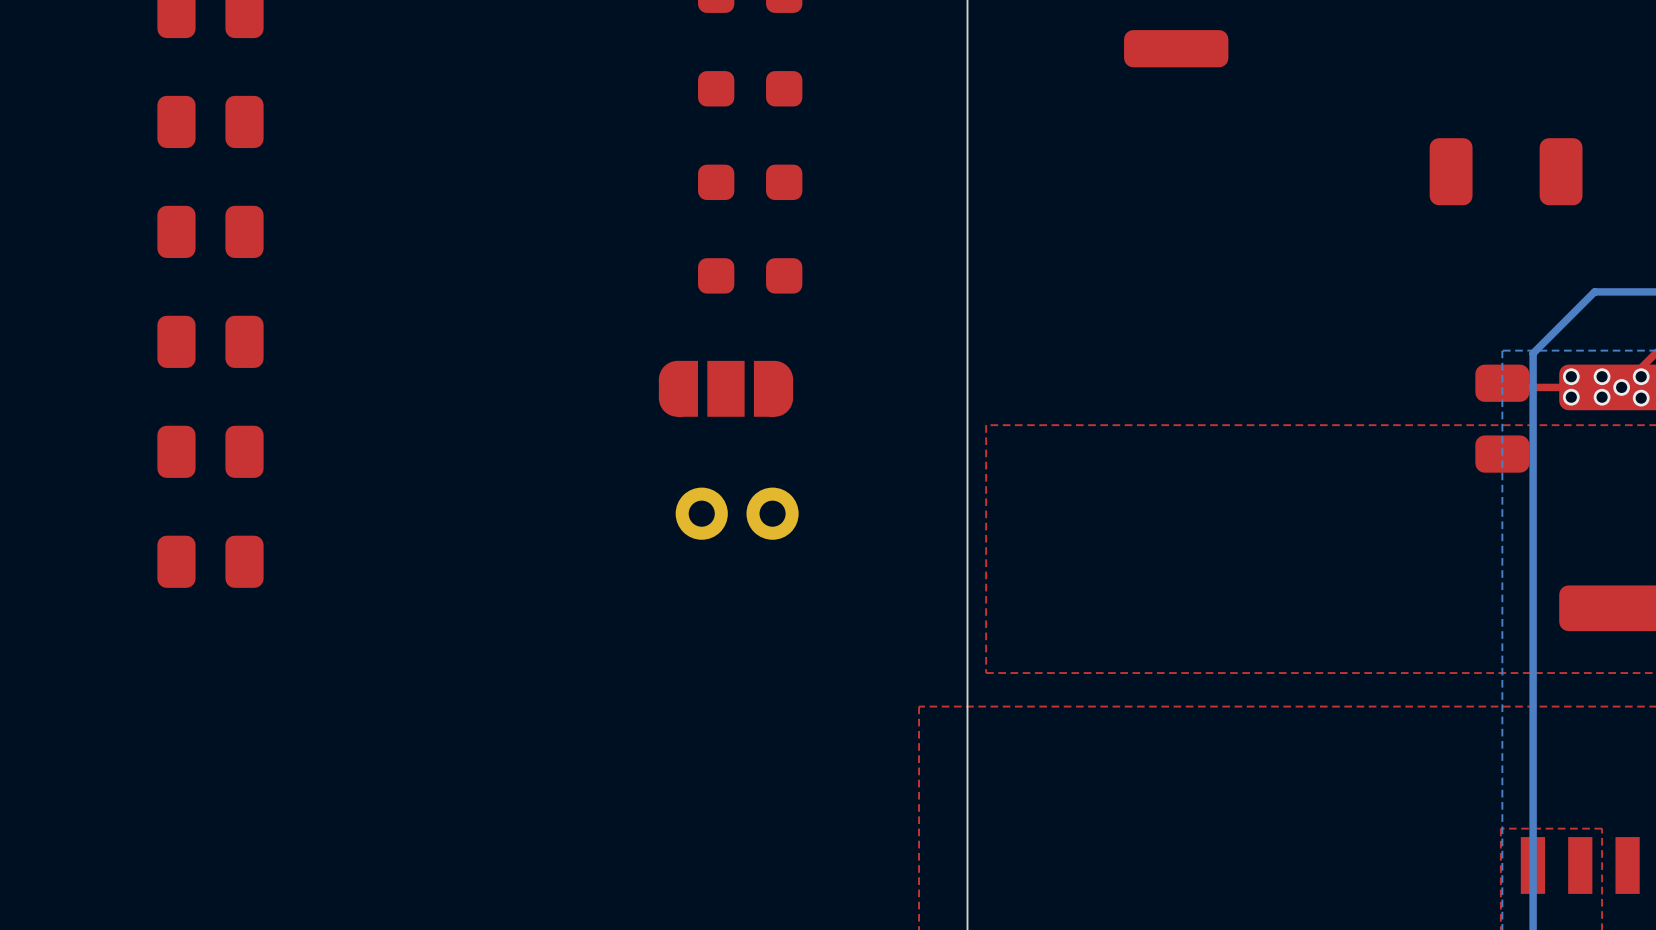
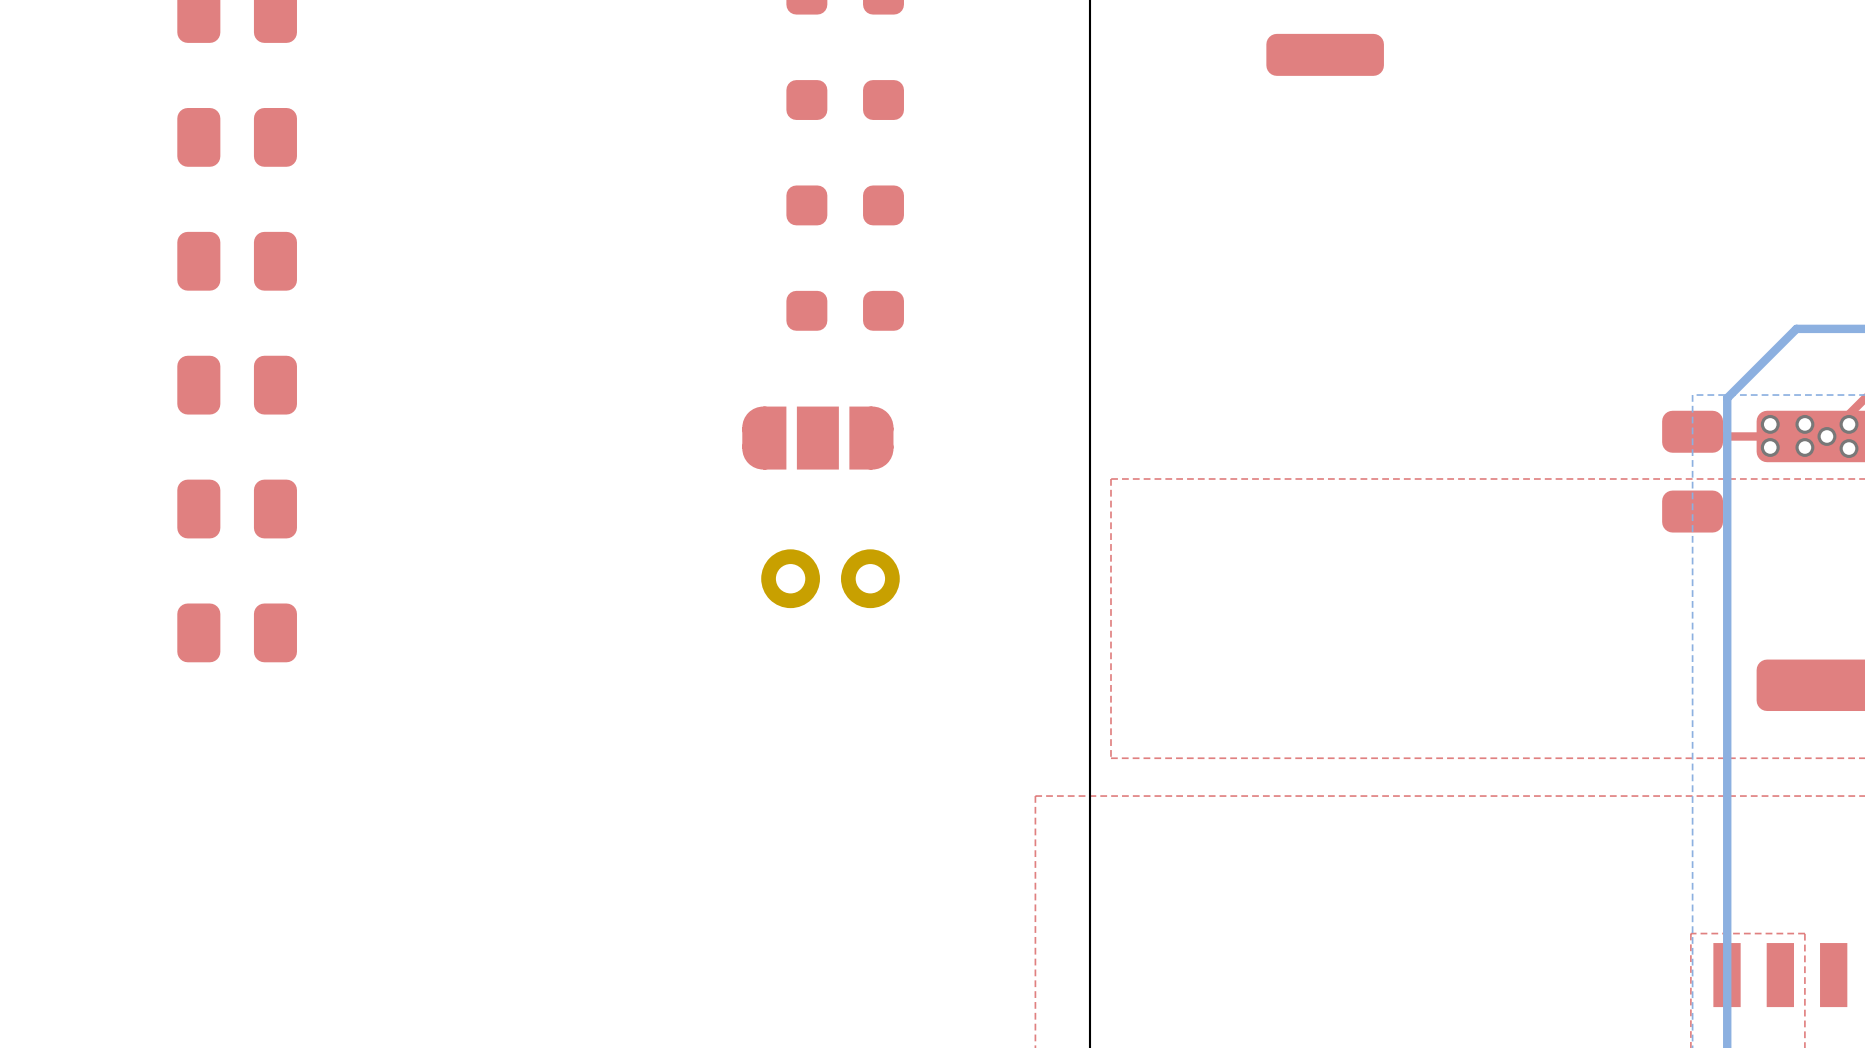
part: (1506, 171) -> none

